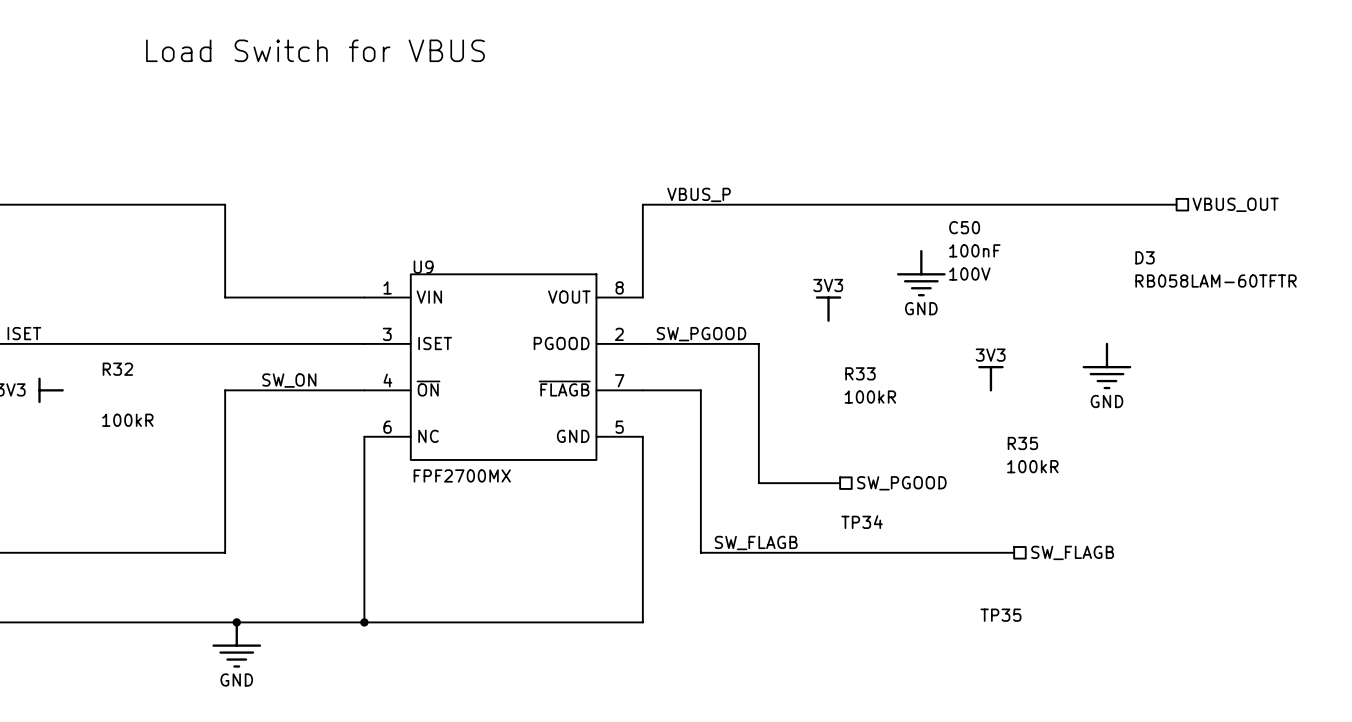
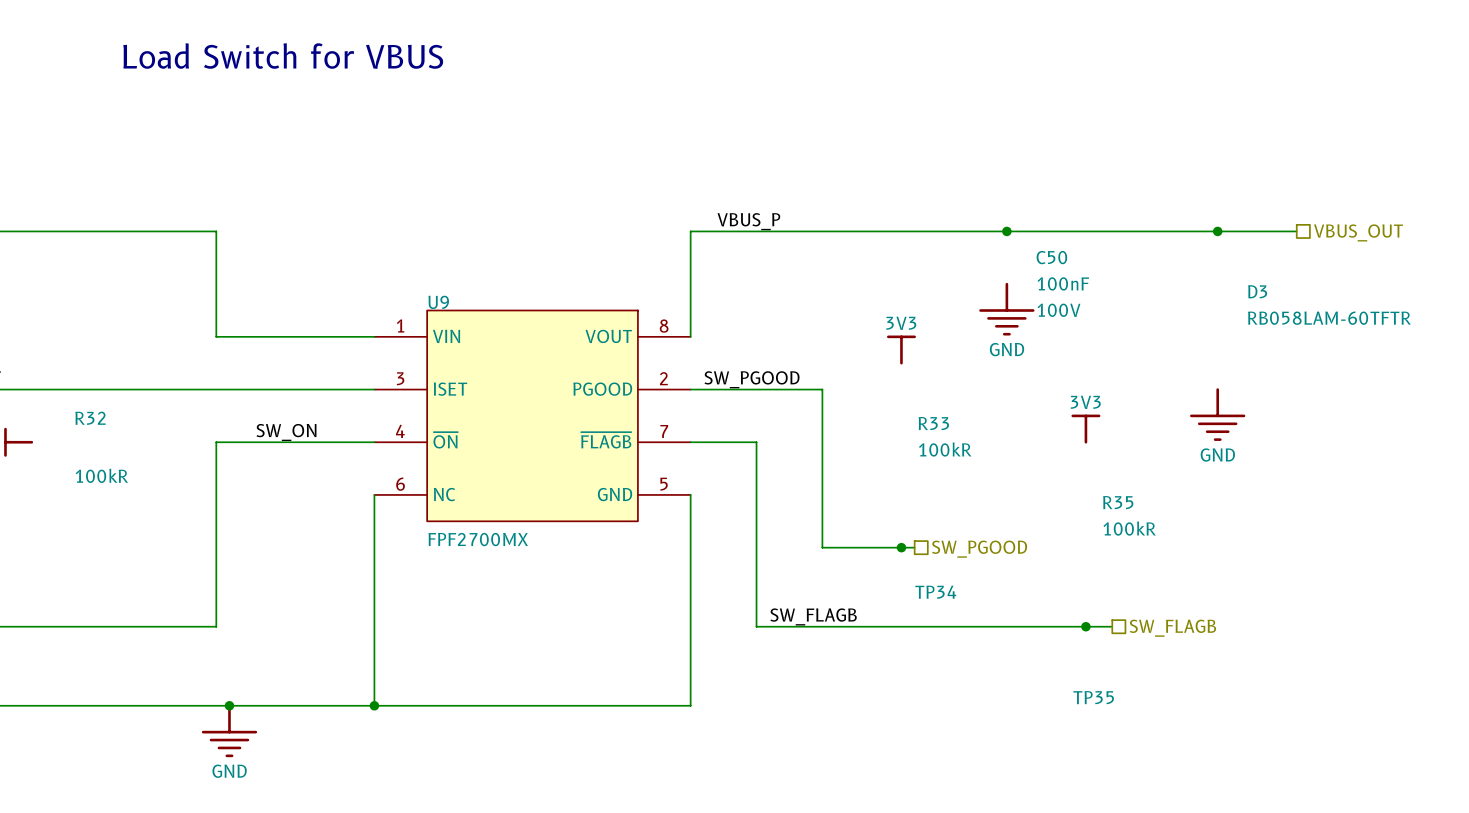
junction: none -> (1006, 231)
junction: none -> (1217, 231)
junction: none -> (901, 547)
junction: none -> (1085, 626)

